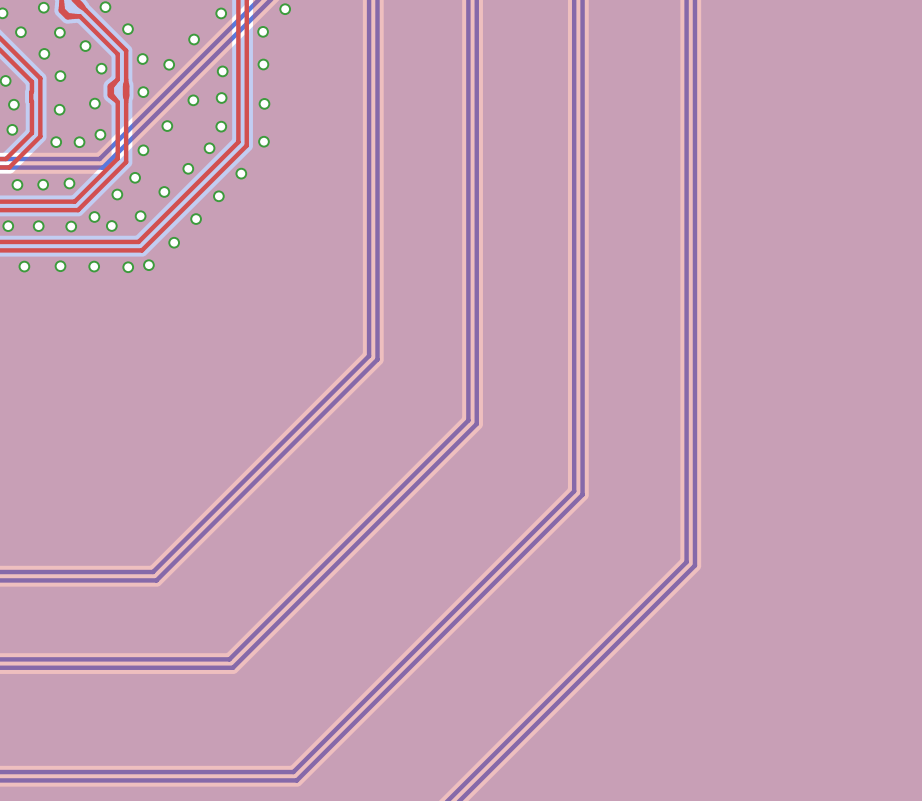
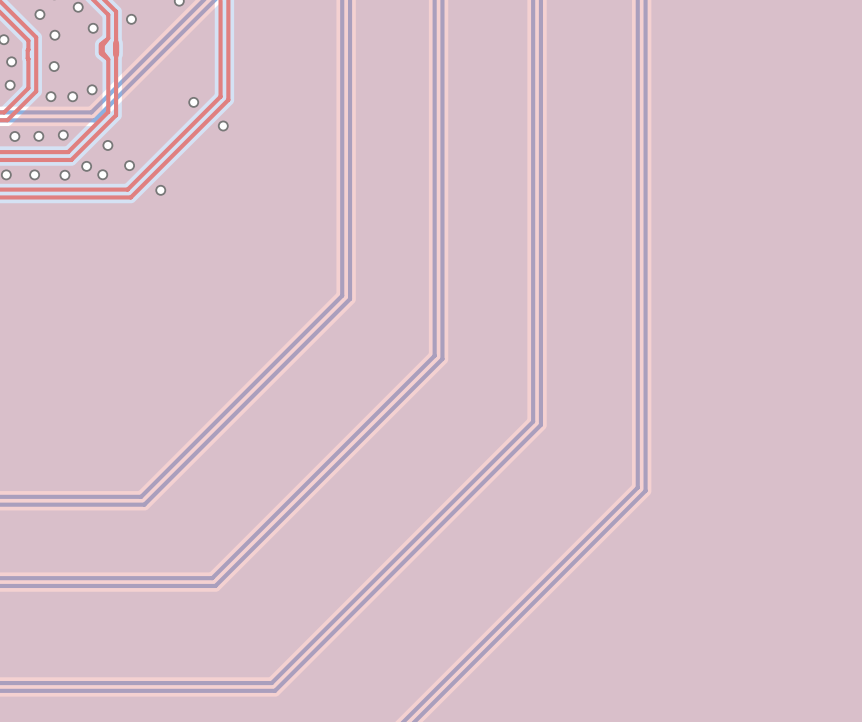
via: (169, 64) -> none
via: (263, 64) -> none
via: (222, 71) -> none
via: (143, 92) -> none
via: (221, 98) -> none
via: (193, 100) -> none
via: (94, 103) -> none
via: (264, 103) -> none
via: (167, 126) -> none
via: (221, 126) -> none
via: (263, 141) -> none
via: (143, 150) -> none
via: (188, 168) -> none
via: (135, 177) -> none
via: (164, 191) -> none
via: (218, 196) -> none
via: (196, 219) -> none
via: (148, 265) -> none
via: (24, 266) -> none
via: (60, 266) -> none
via: (94, 266) -> none
via: (128, 267) -> none

